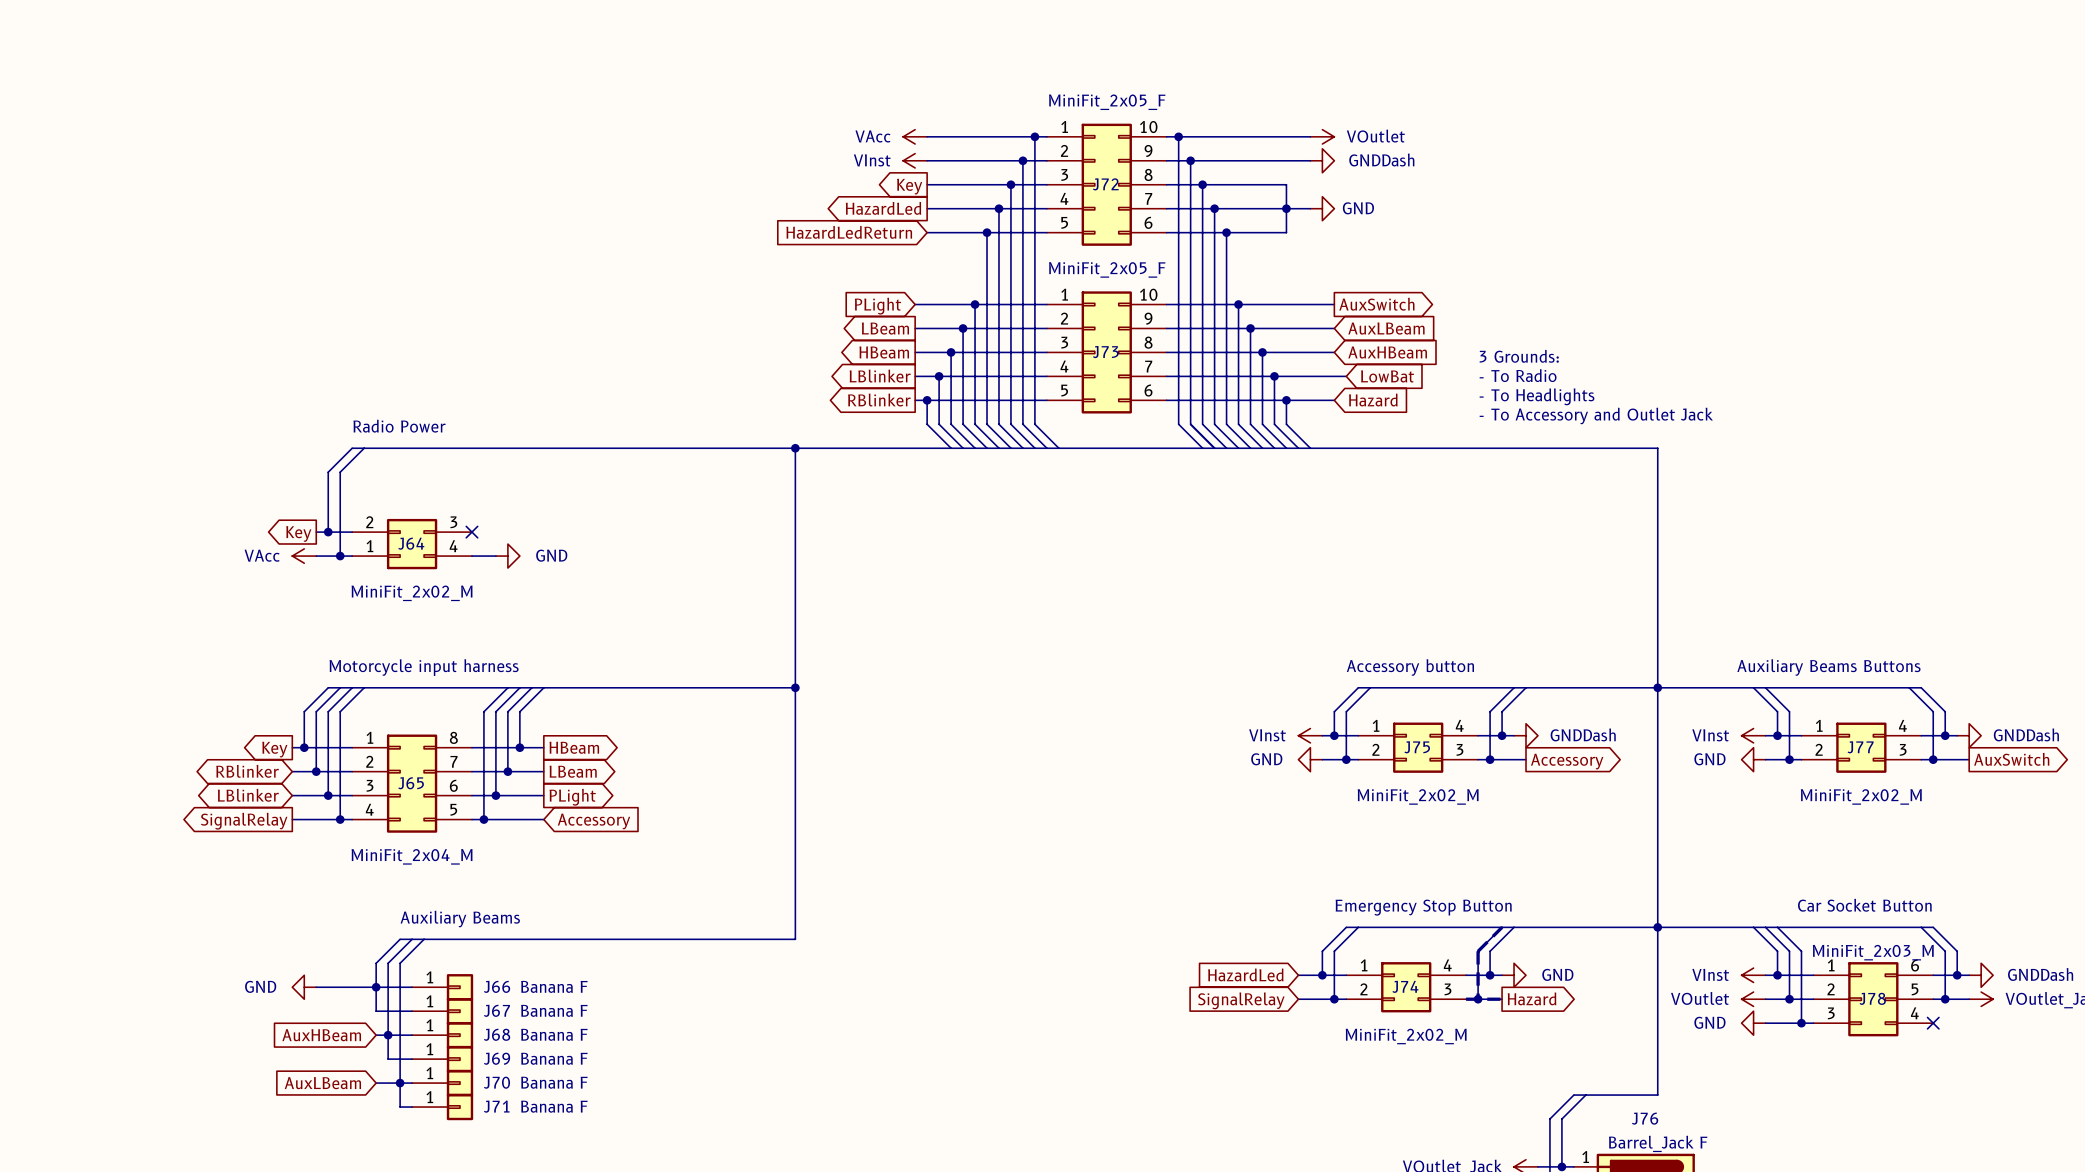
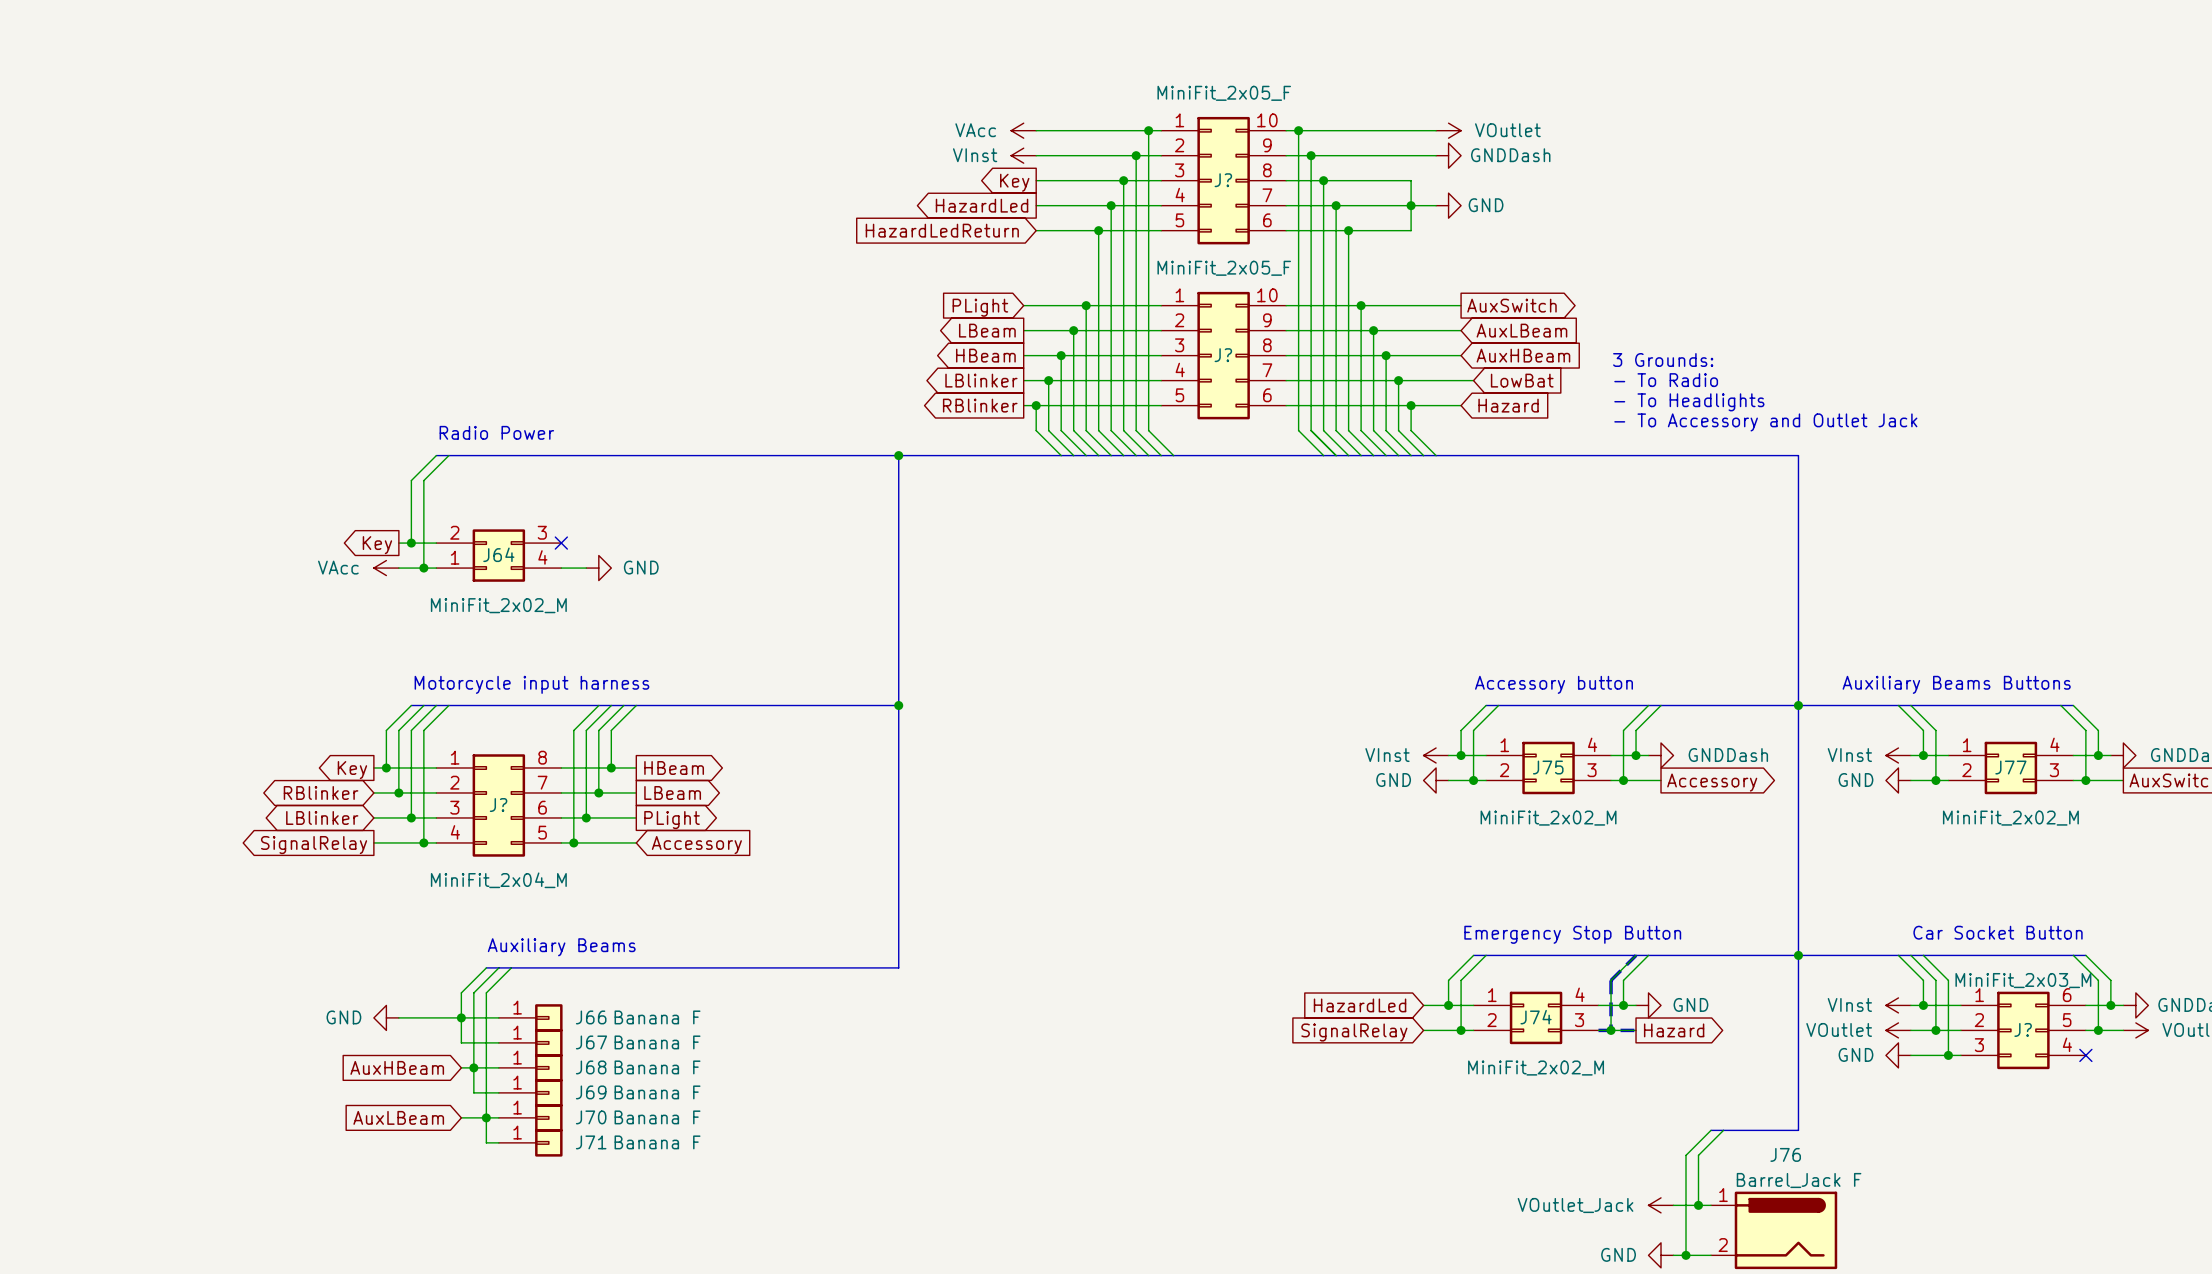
J72 name: J72 (1105, 184) -> J? (1223, 180)
J73 name: J73 (1105, 352) -> J? (1223, 355)
J65 name: J65 (411, 783) -> J? (498, 805)
J78 name: J78 (1872, 998) -> J? (2023, 1029)

